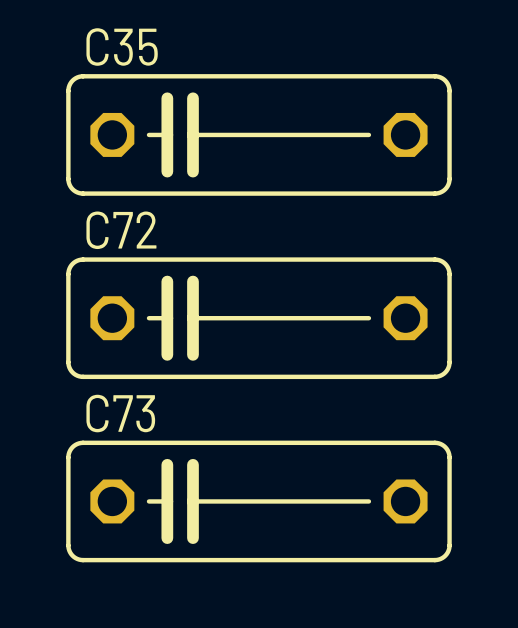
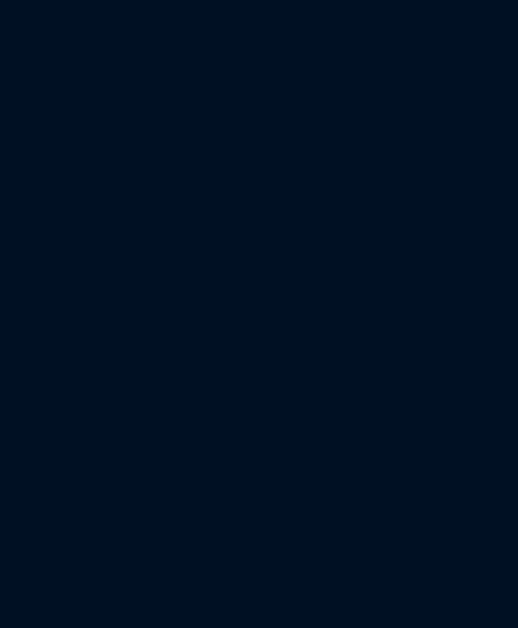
C35: (258, 134) -> none
C72: (258, 318) -> none
C73: (258, 501) -> none

